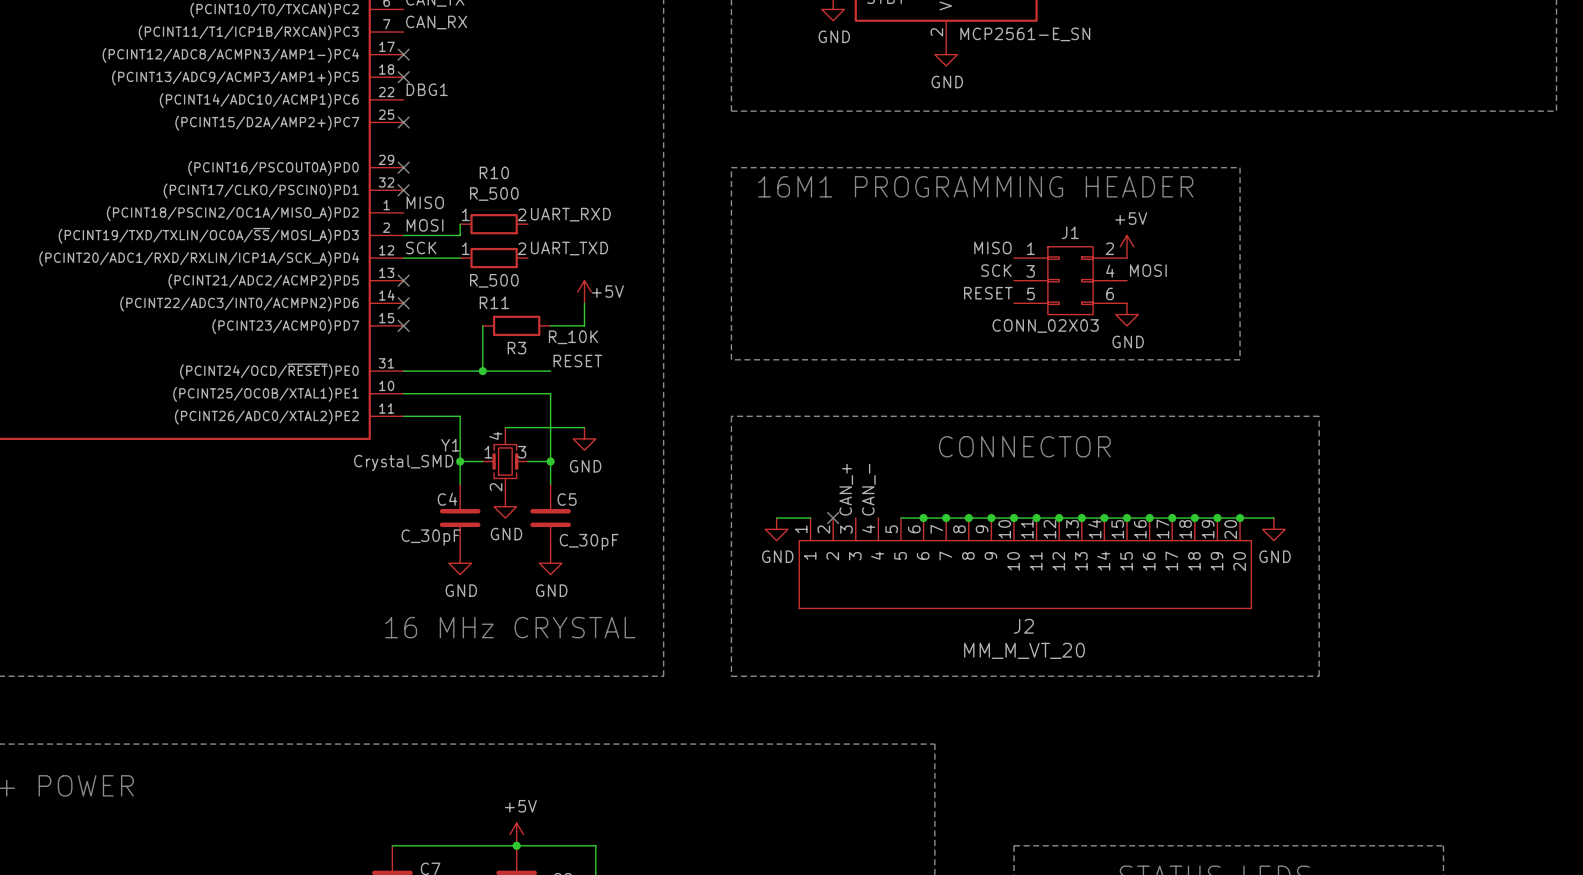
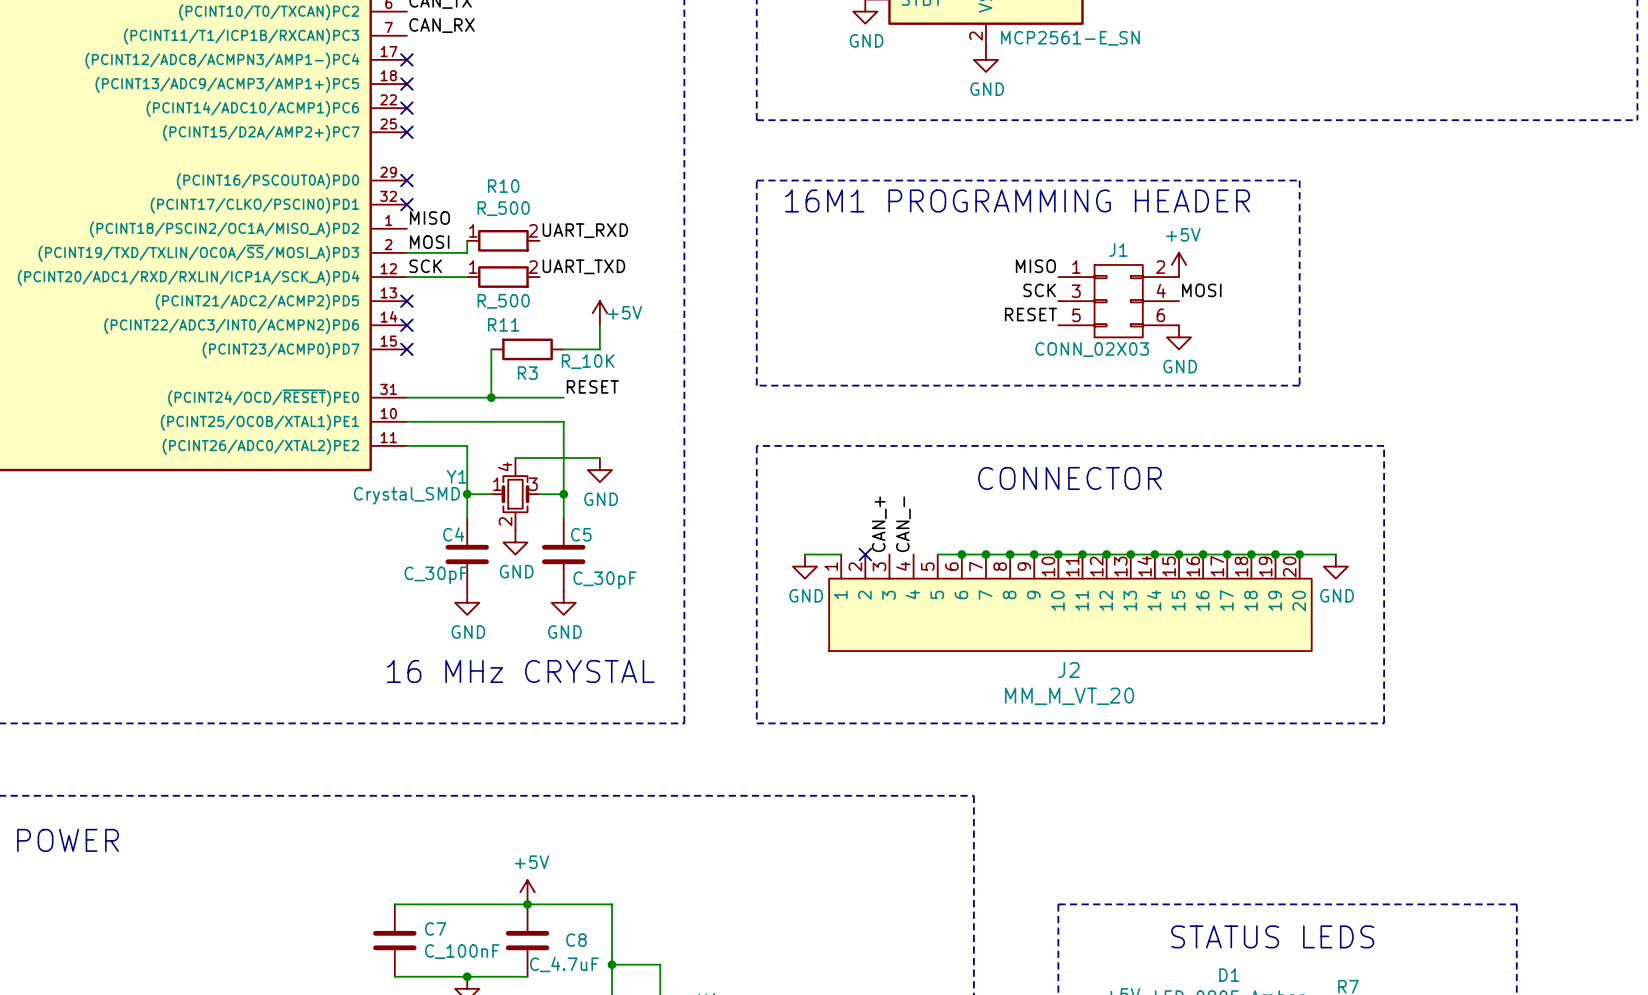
label: DBG1 (427, 89) -> none
no-connect mark: none -> (406, 108)

